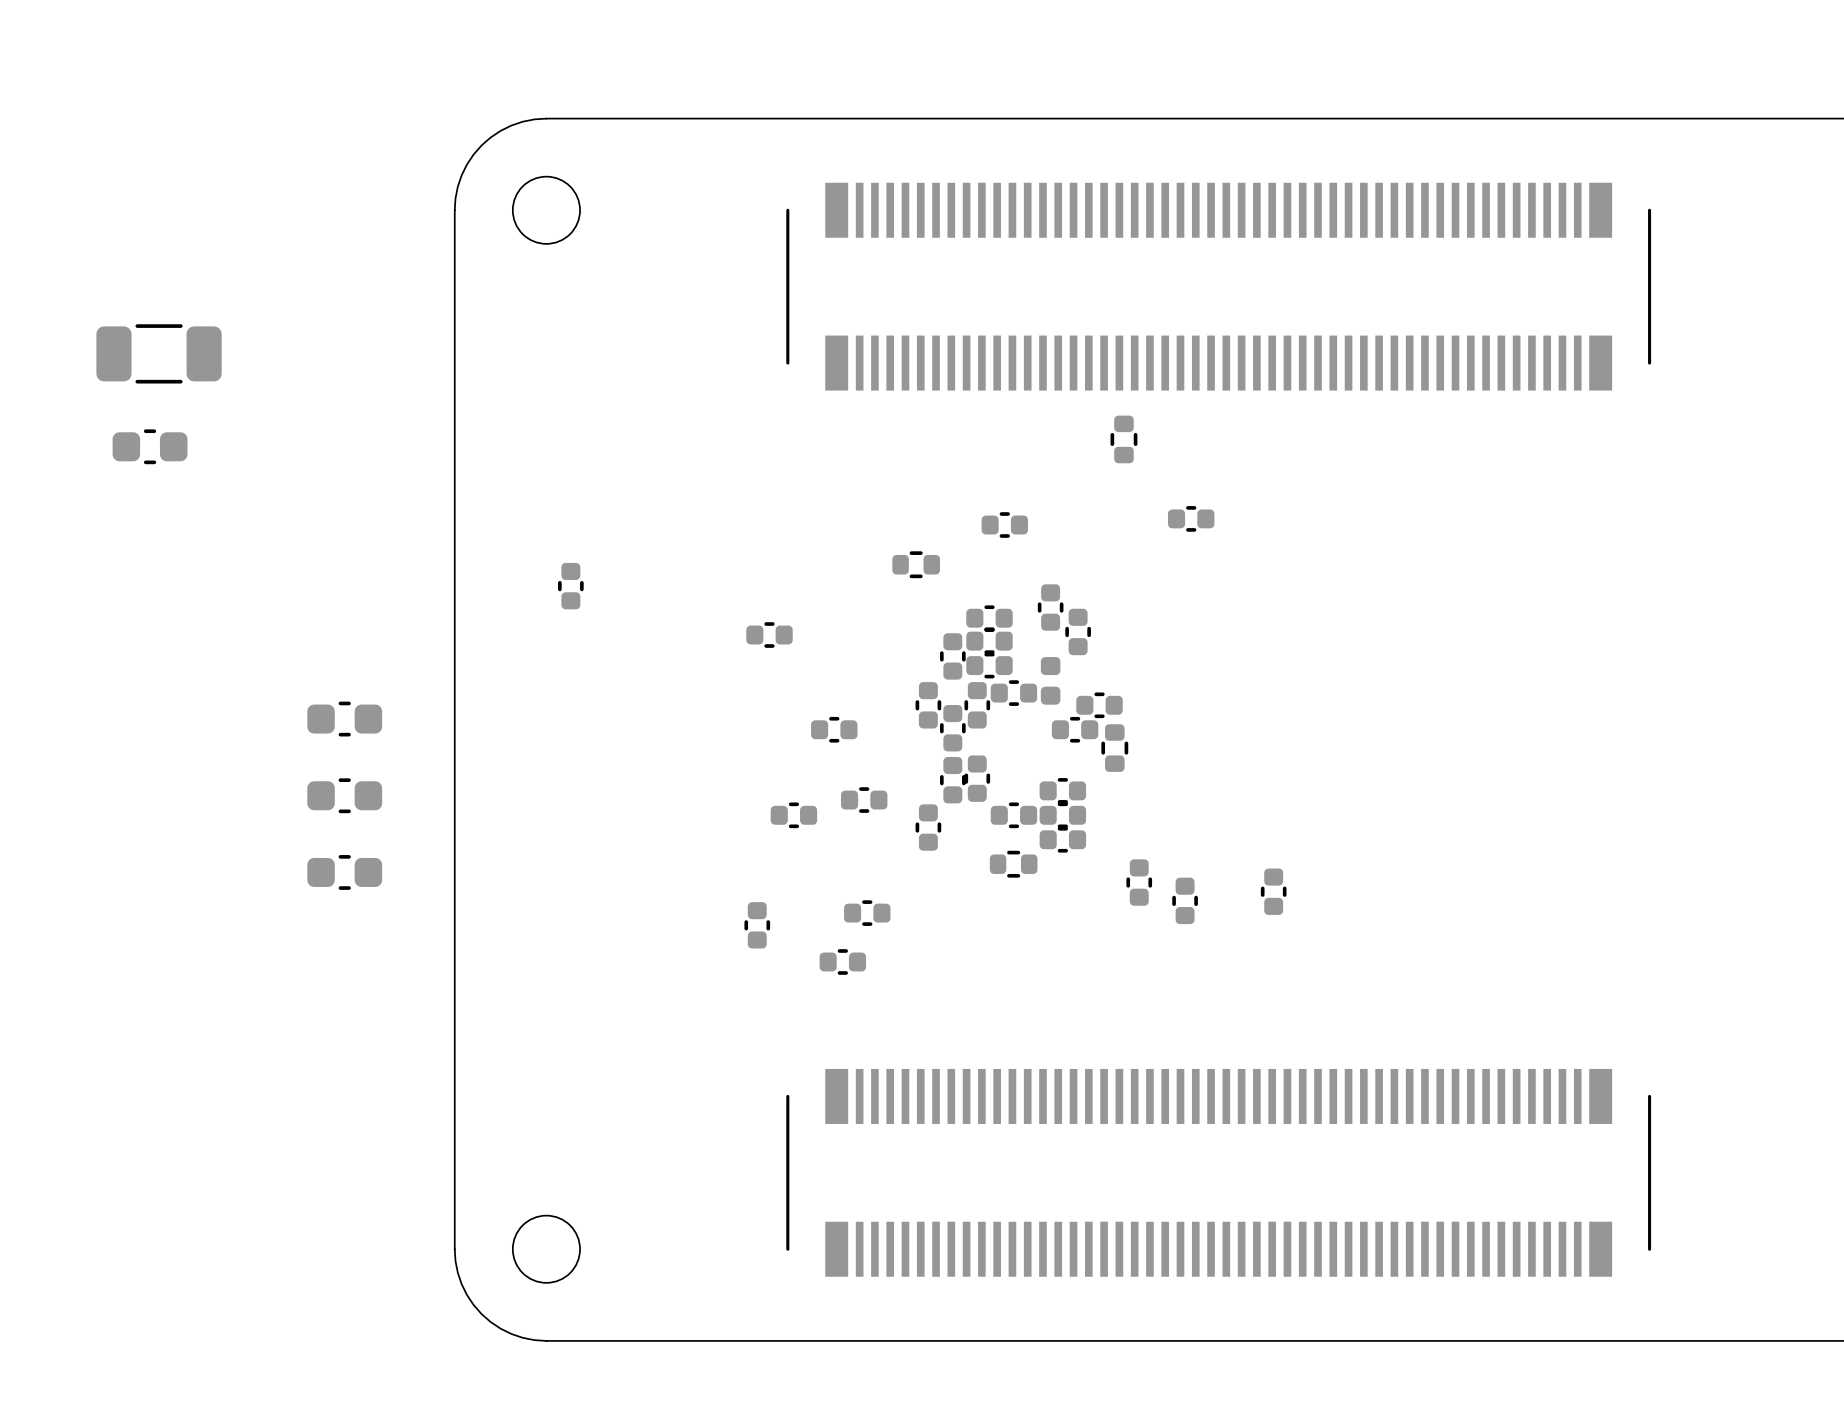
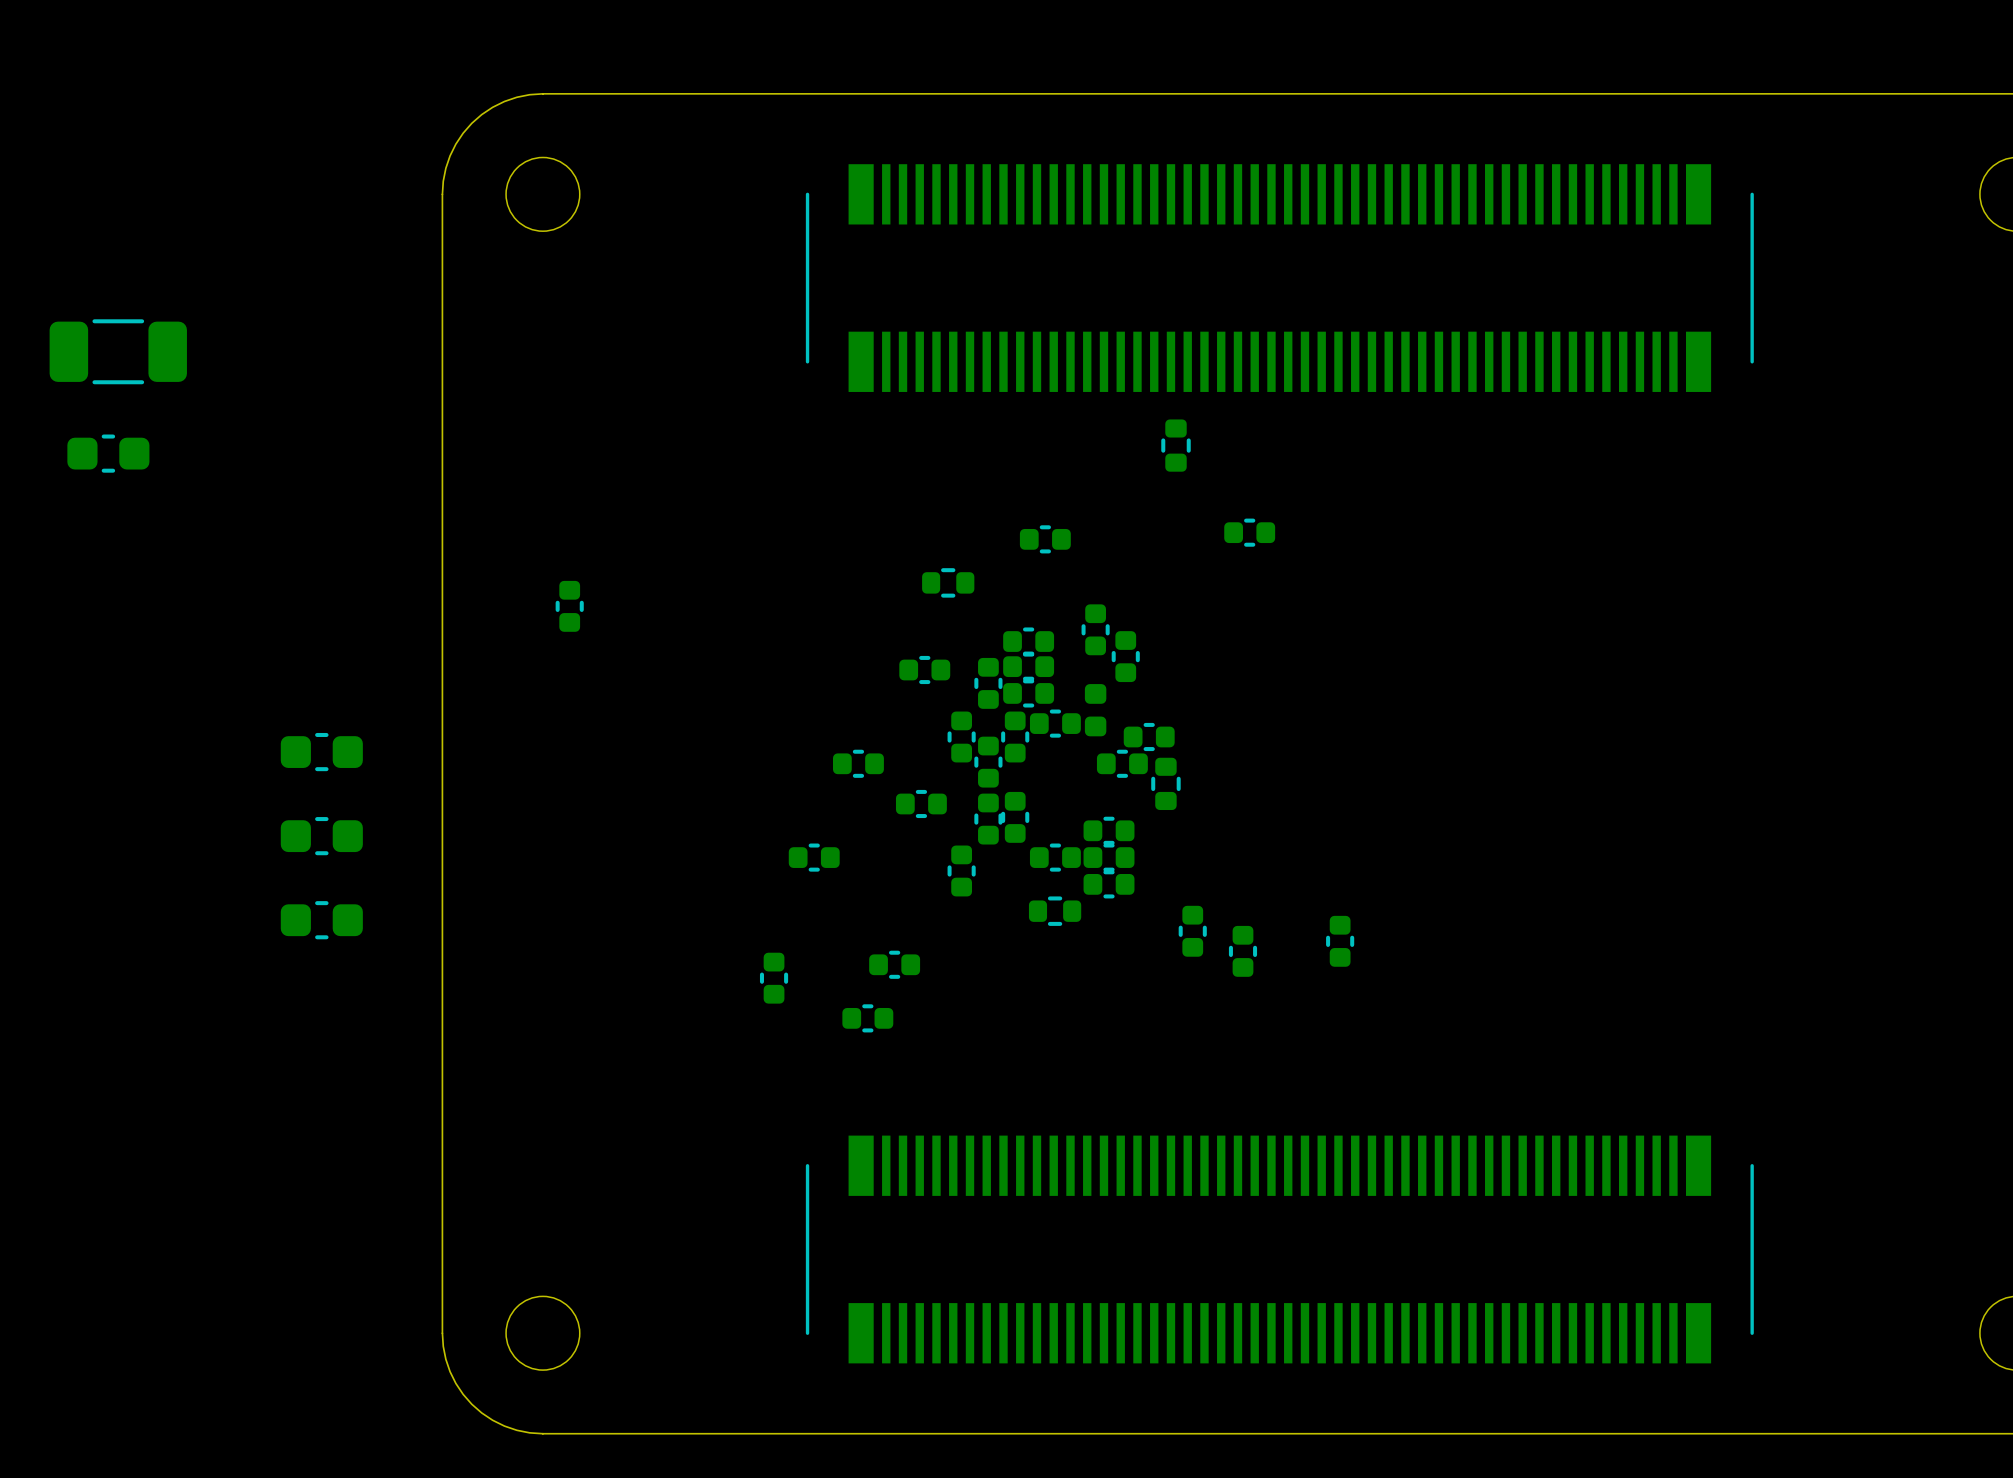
part: (769, 635) -> none
part: none -> (924, 669)
part position: (864, 800) -> (921, 803)

